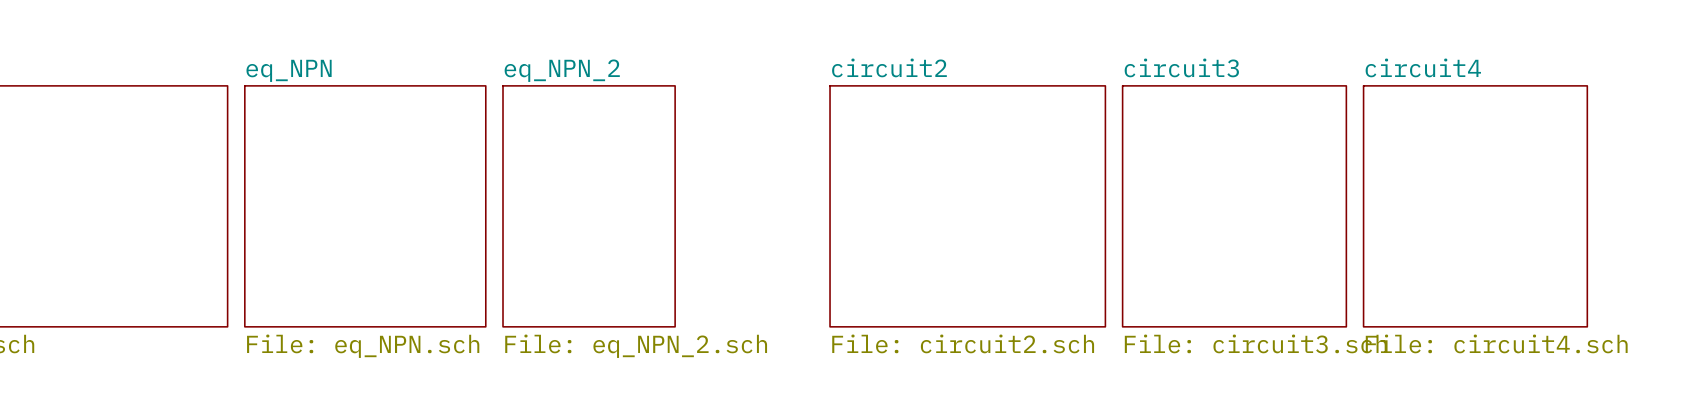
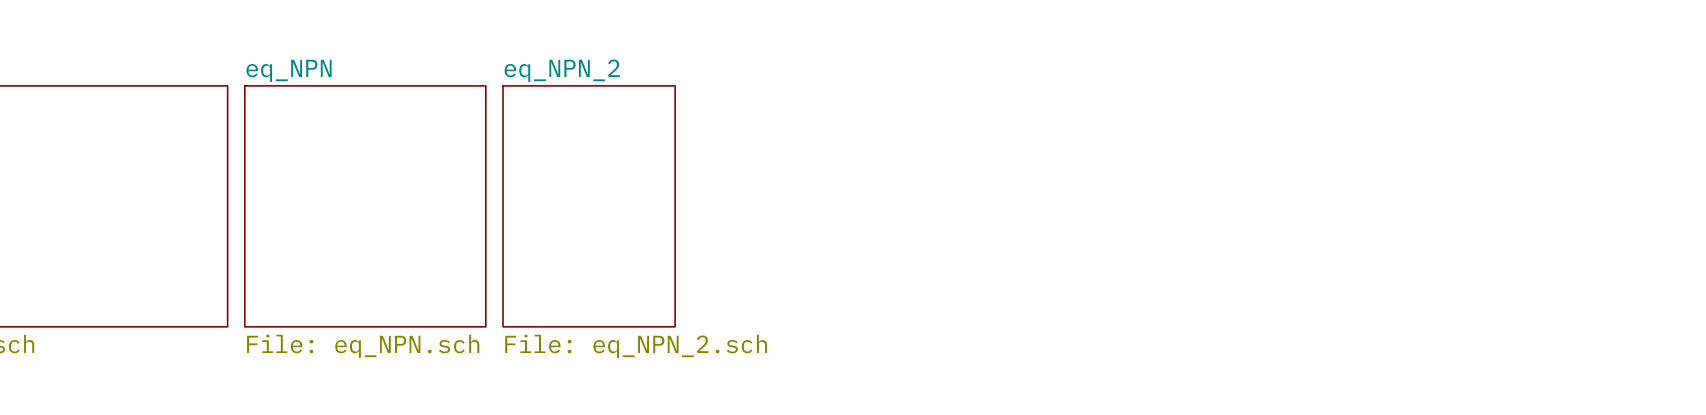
sheet circuit2: File: circuit2.sch (967, 206) -> none
sheet circuit3: File: circuit3.sch (1234, 206) -> none
sheet circuit4: File: circuit4.sch (1475, 206) -> none

